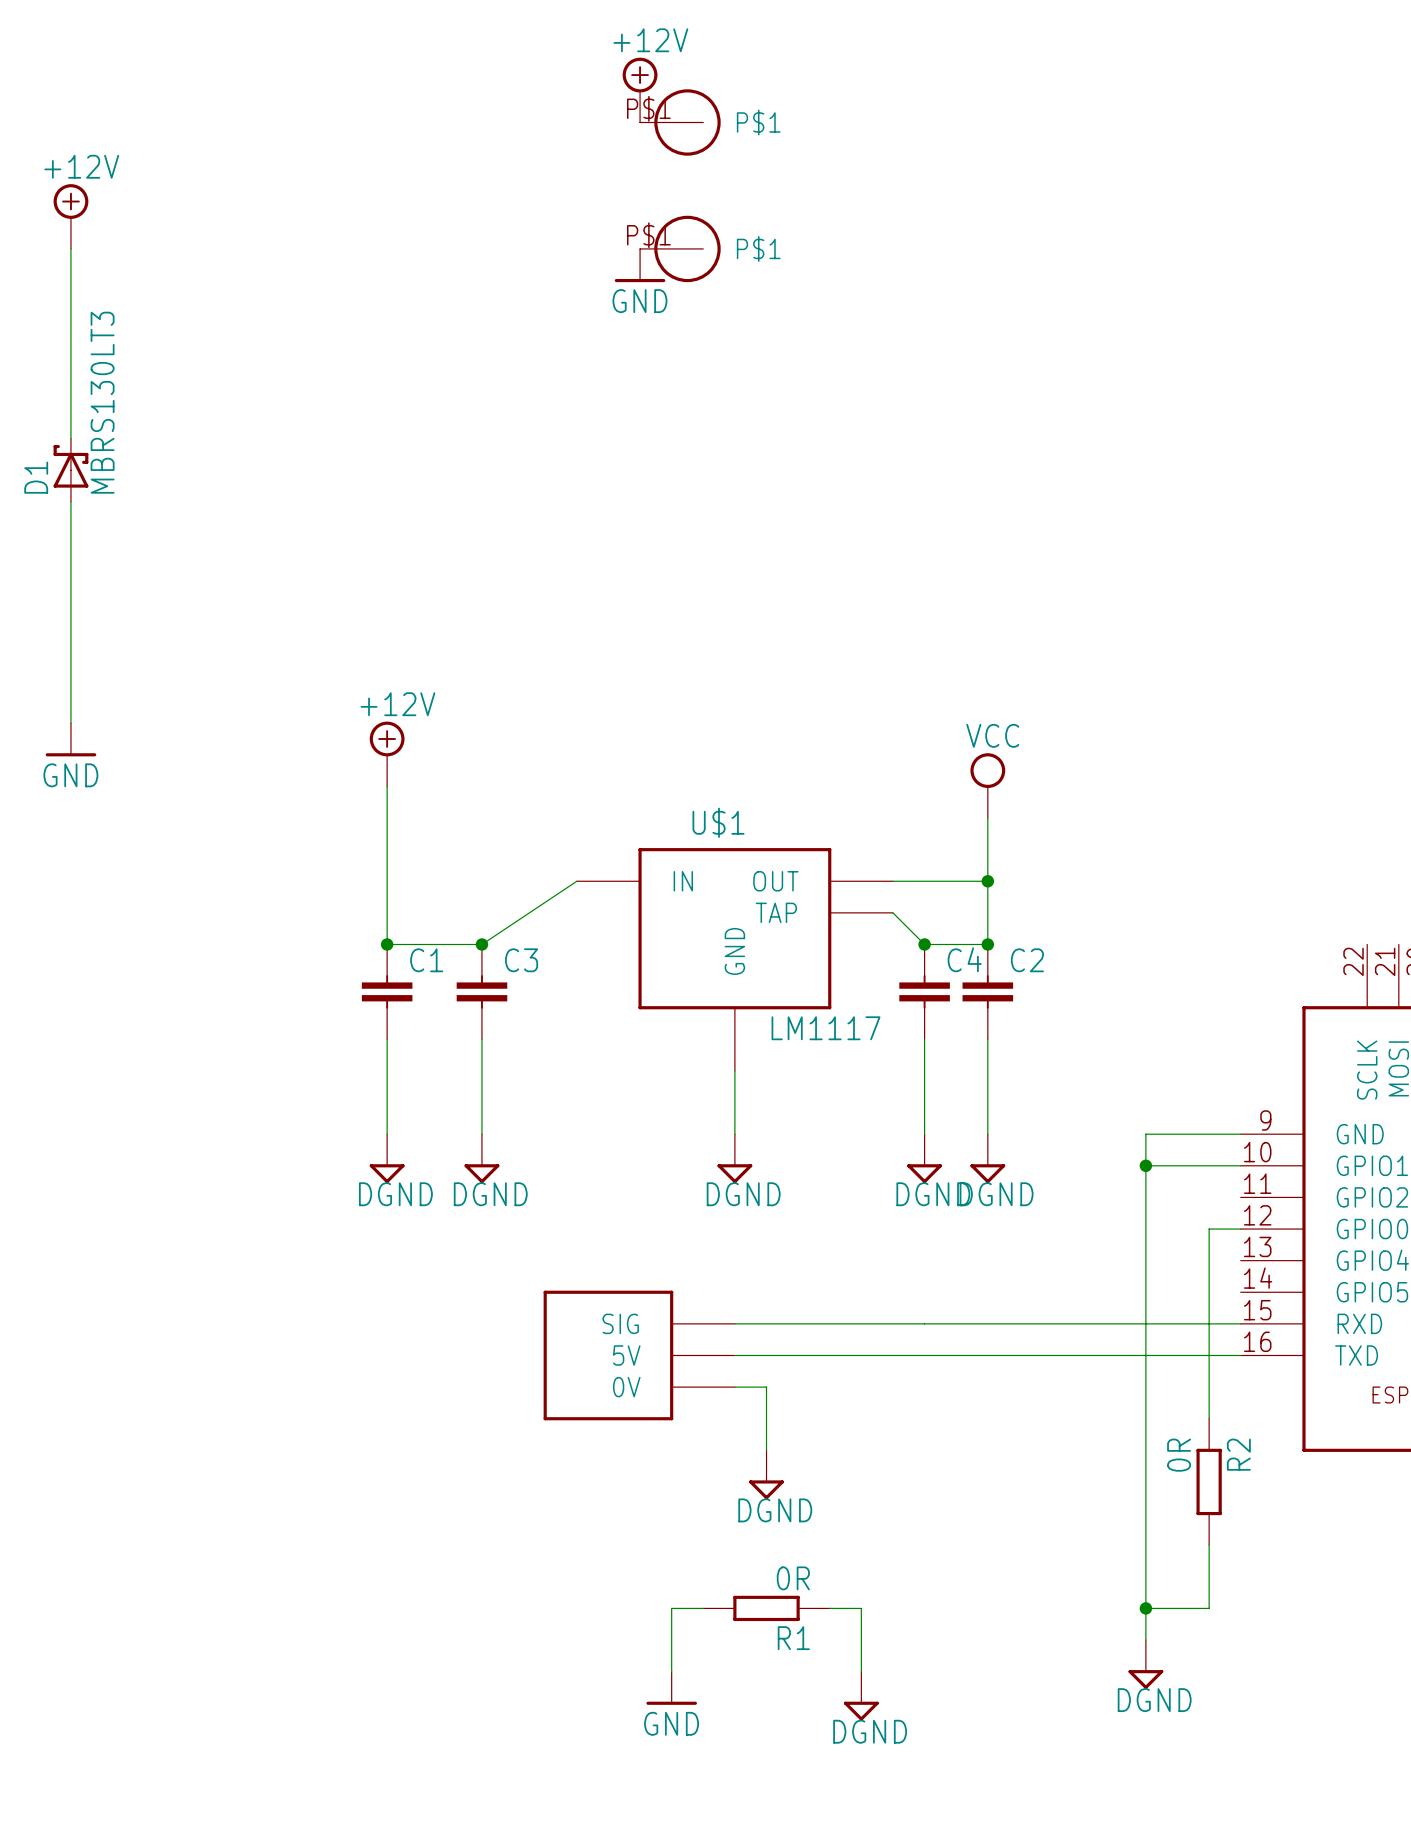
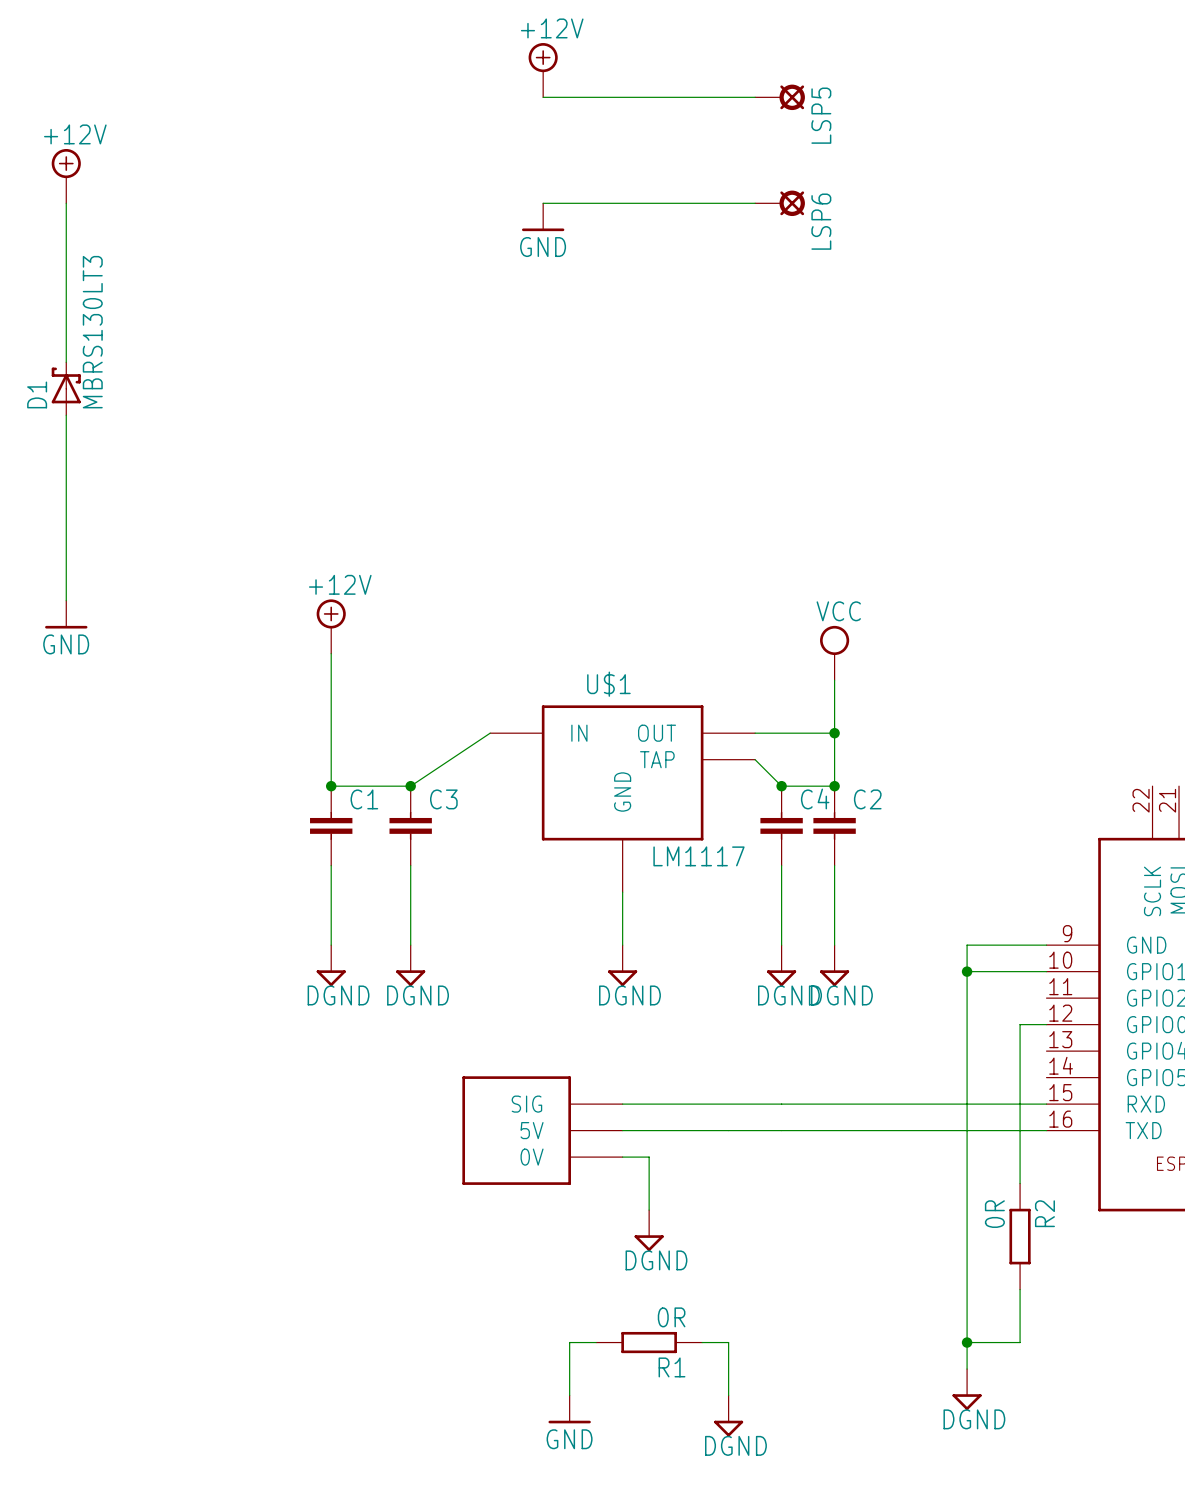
wire: none -> (543, 97) (755, 97)
part: (680, 122) -> none
LSP5: none -> (780, 97)
wire: none -> (543, 203) (755, 203)
part: (680, 248) -> none
LSP6: none -> (780, 203)

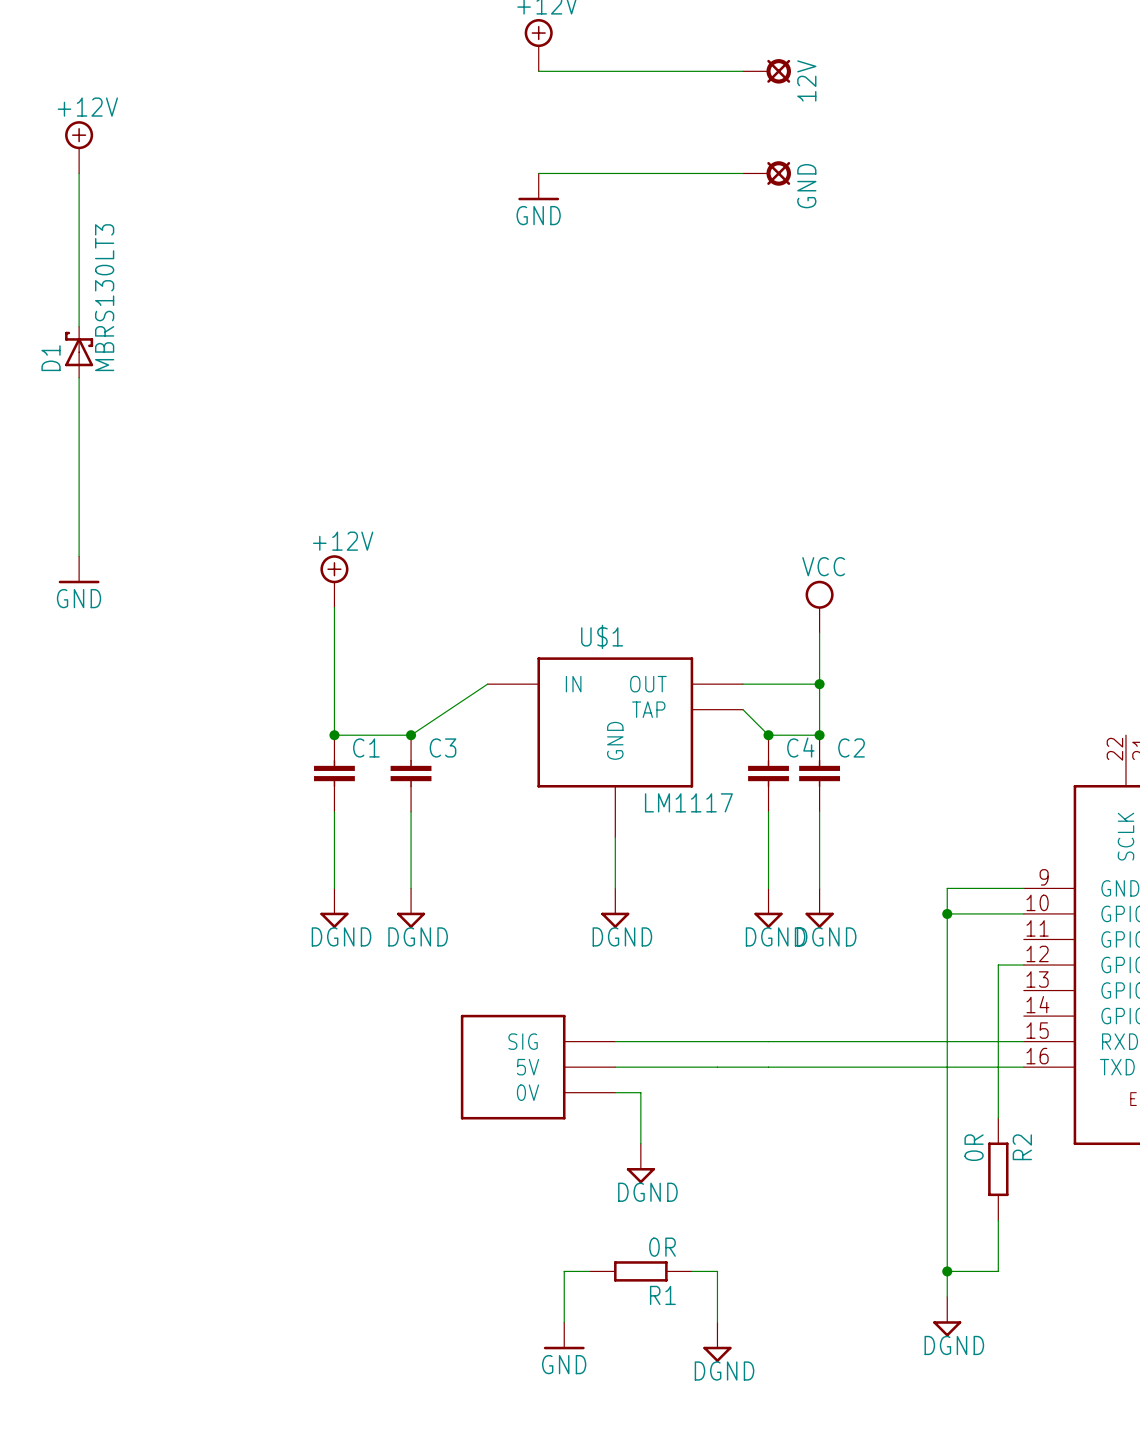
LSP5 name: LSP5 (821, 115) -> 12V (806, 80)
LSP6 name: LSP6 (821, 221) -> GND (806, 186)

